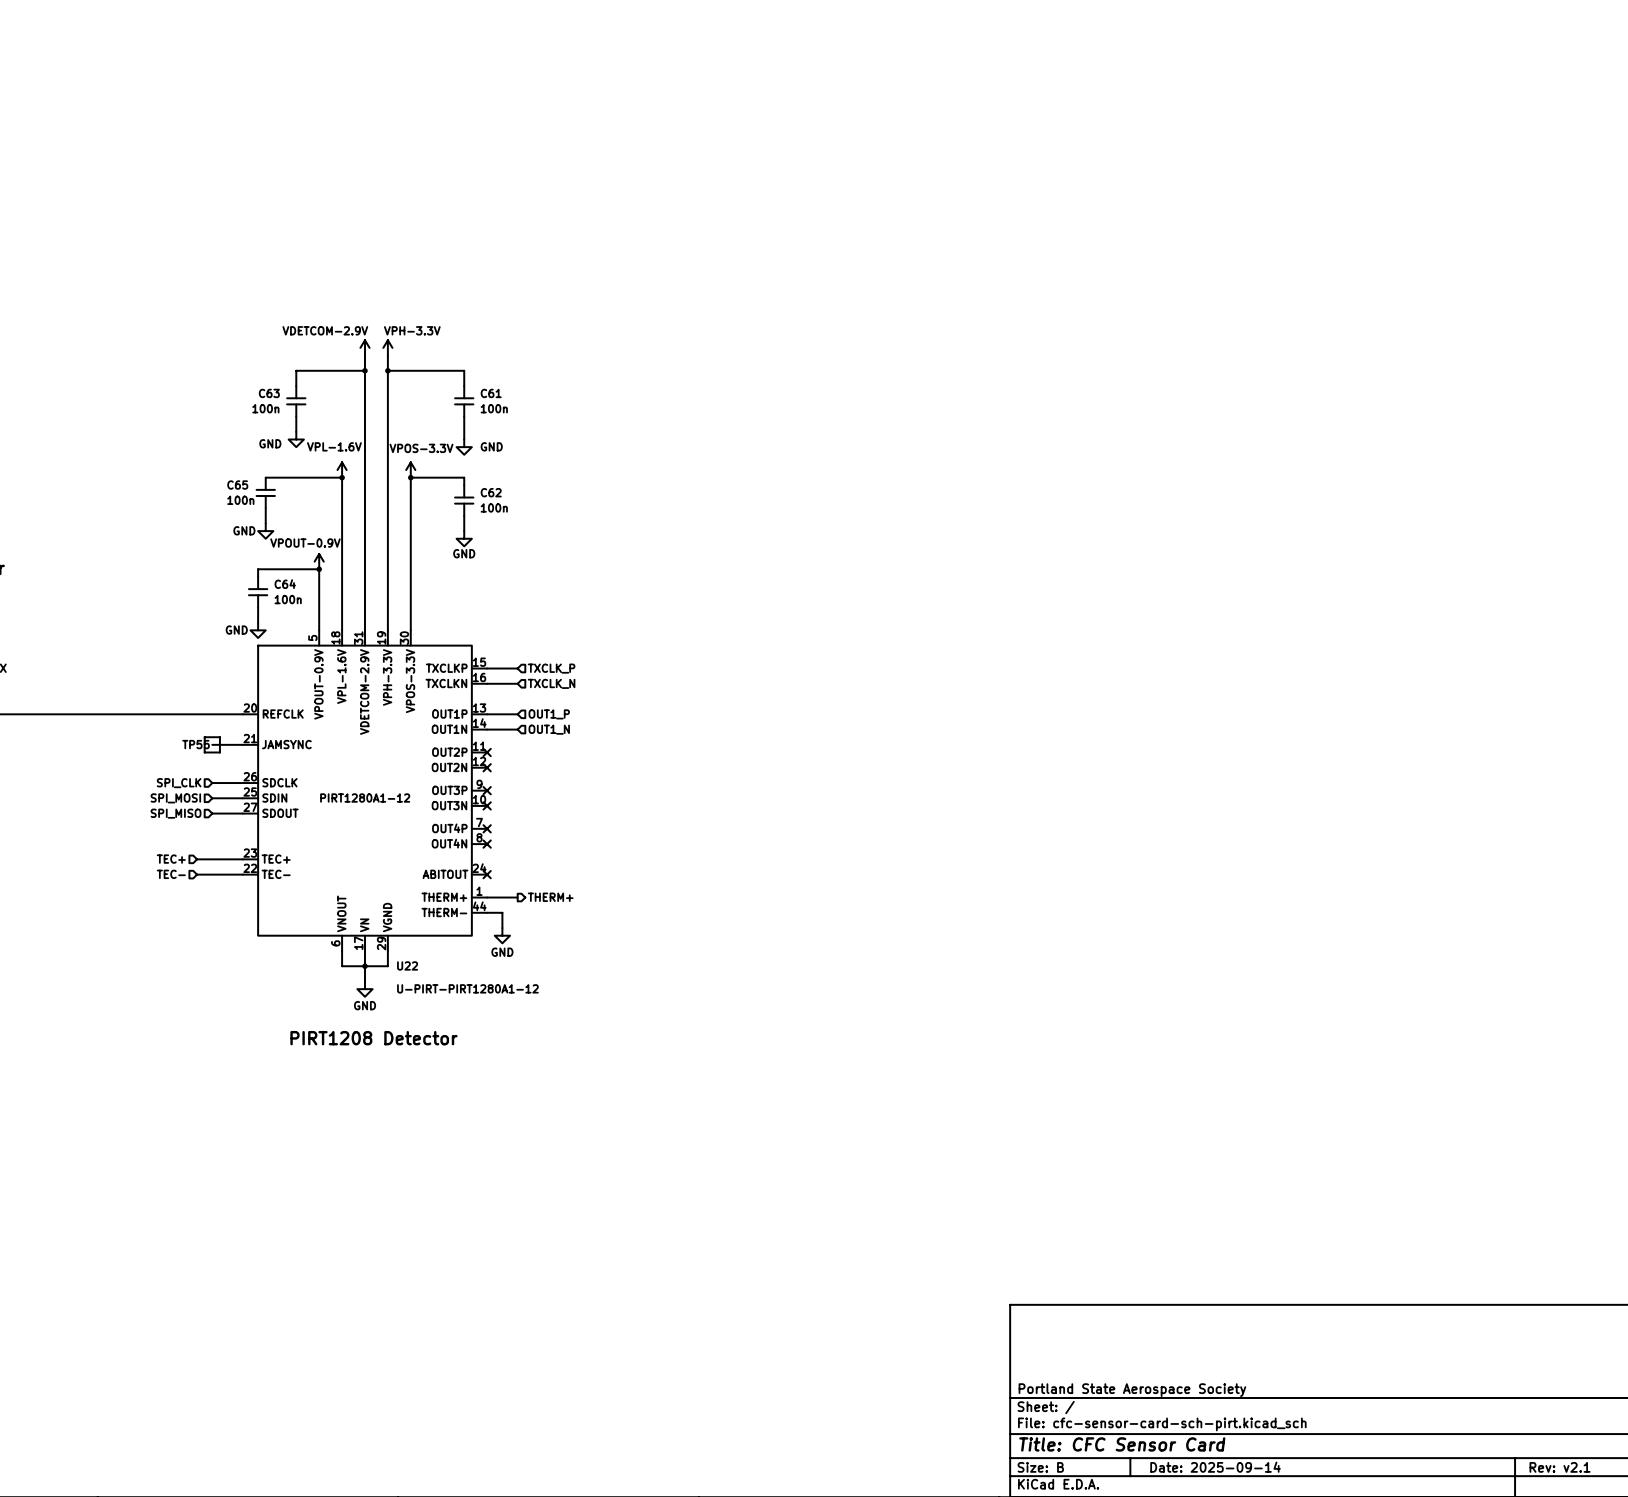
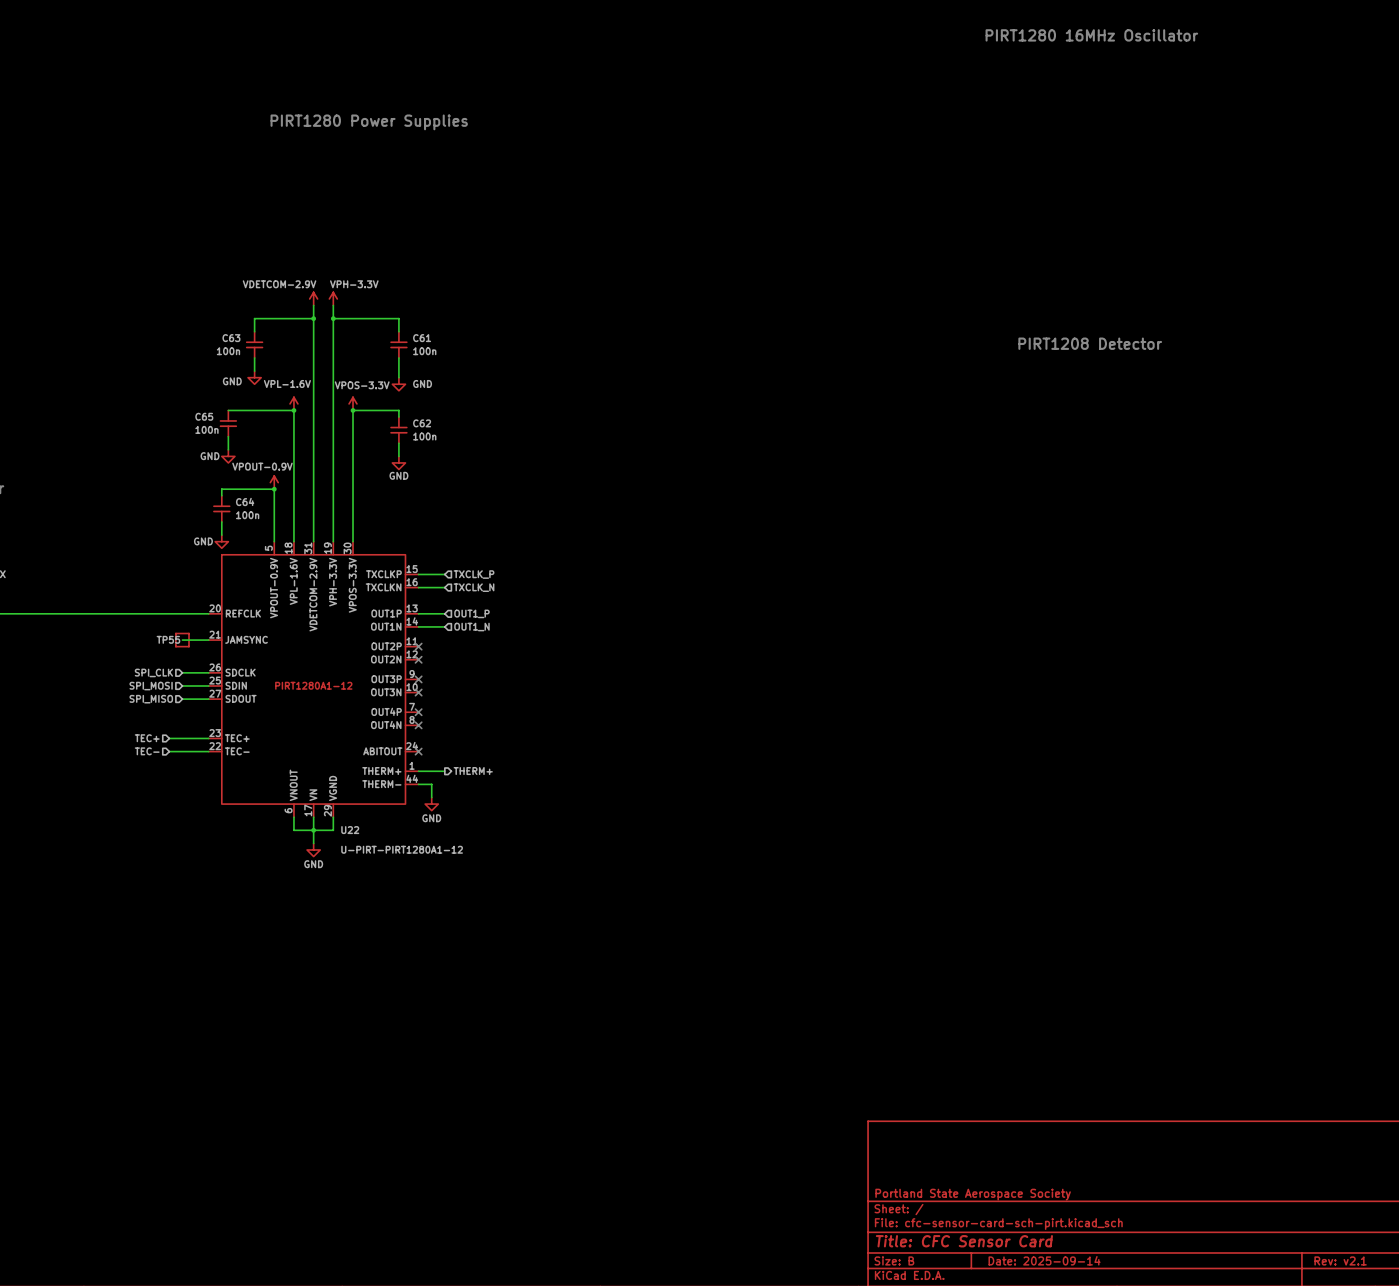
text: none -> PIRT1280 16MHz Oscillator (1091, 35)
text: none -> PIRT1280 Power Supplies (369, 122)
text: none -> PIRT1208 Detector (1090, 343)
text: PIRT1208 Detector (374, 1038) -> none

